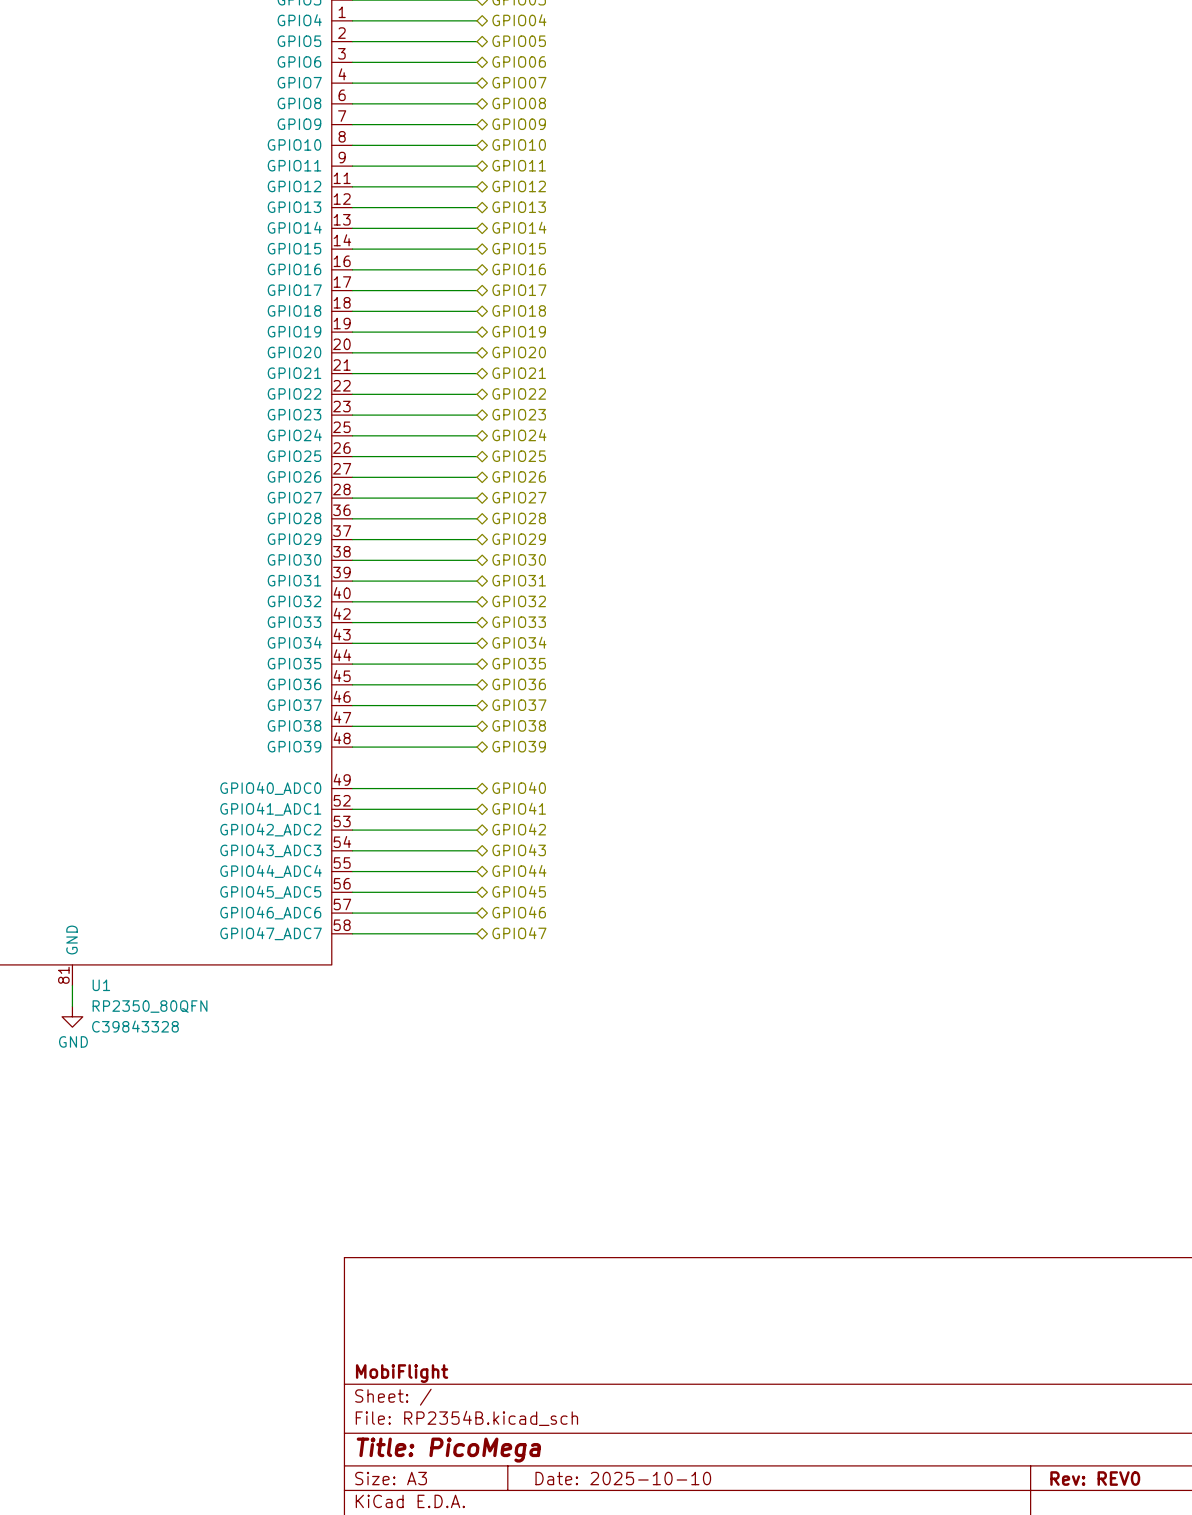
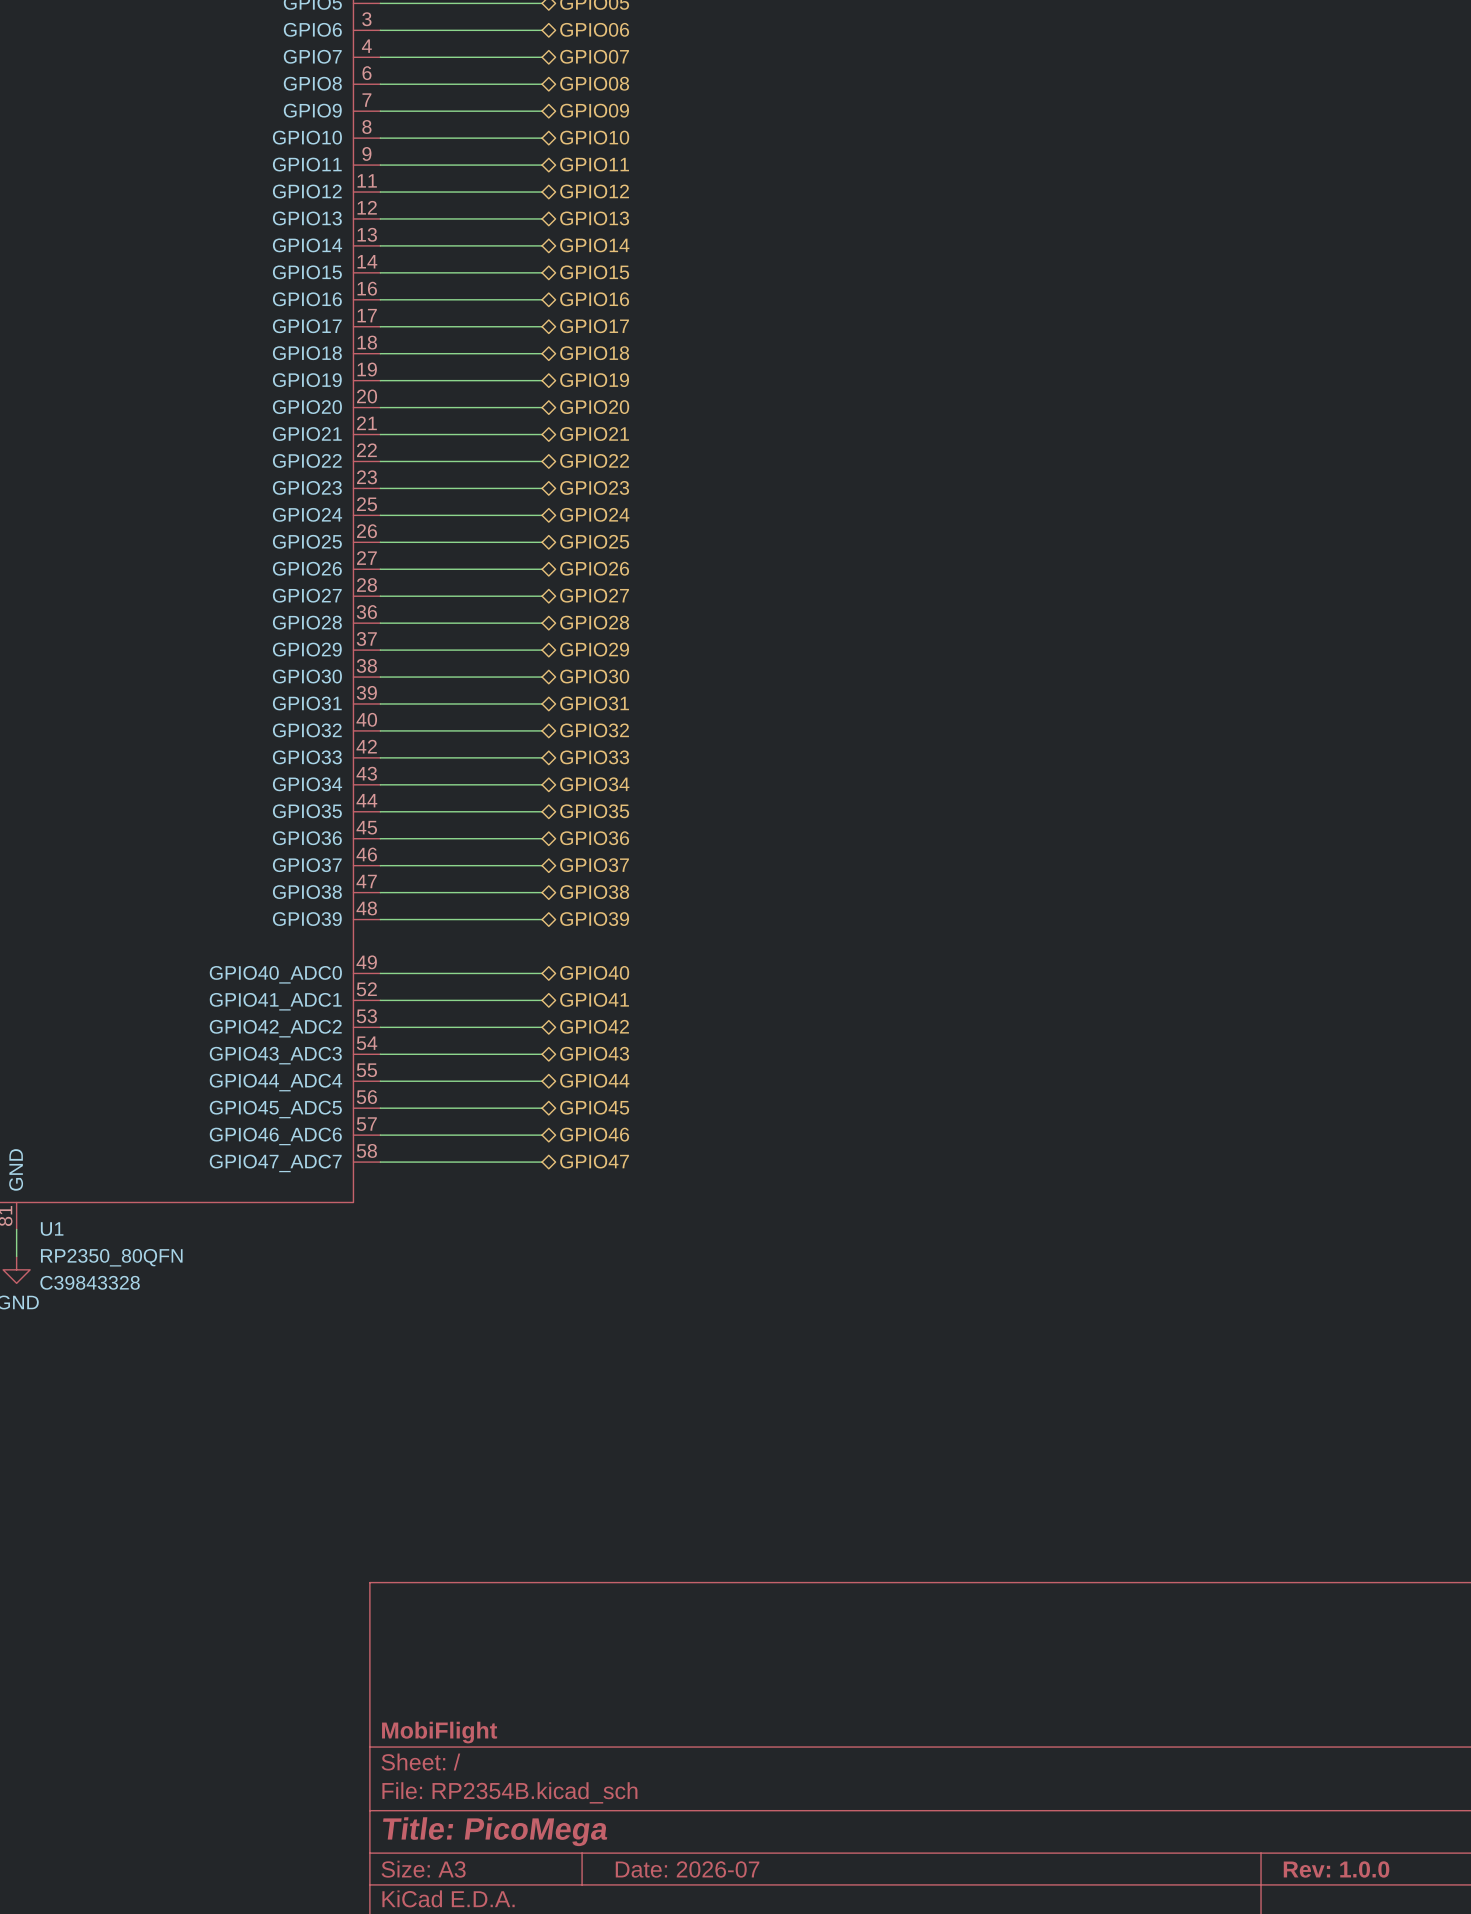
title block: Date: 2025-10-10 (623, 1478) -> Date: 2026-07 (687, 1869)
title block: Rev: REV0 (1095, 1478) -> Rev: 1.0.0 (1336, 1869)

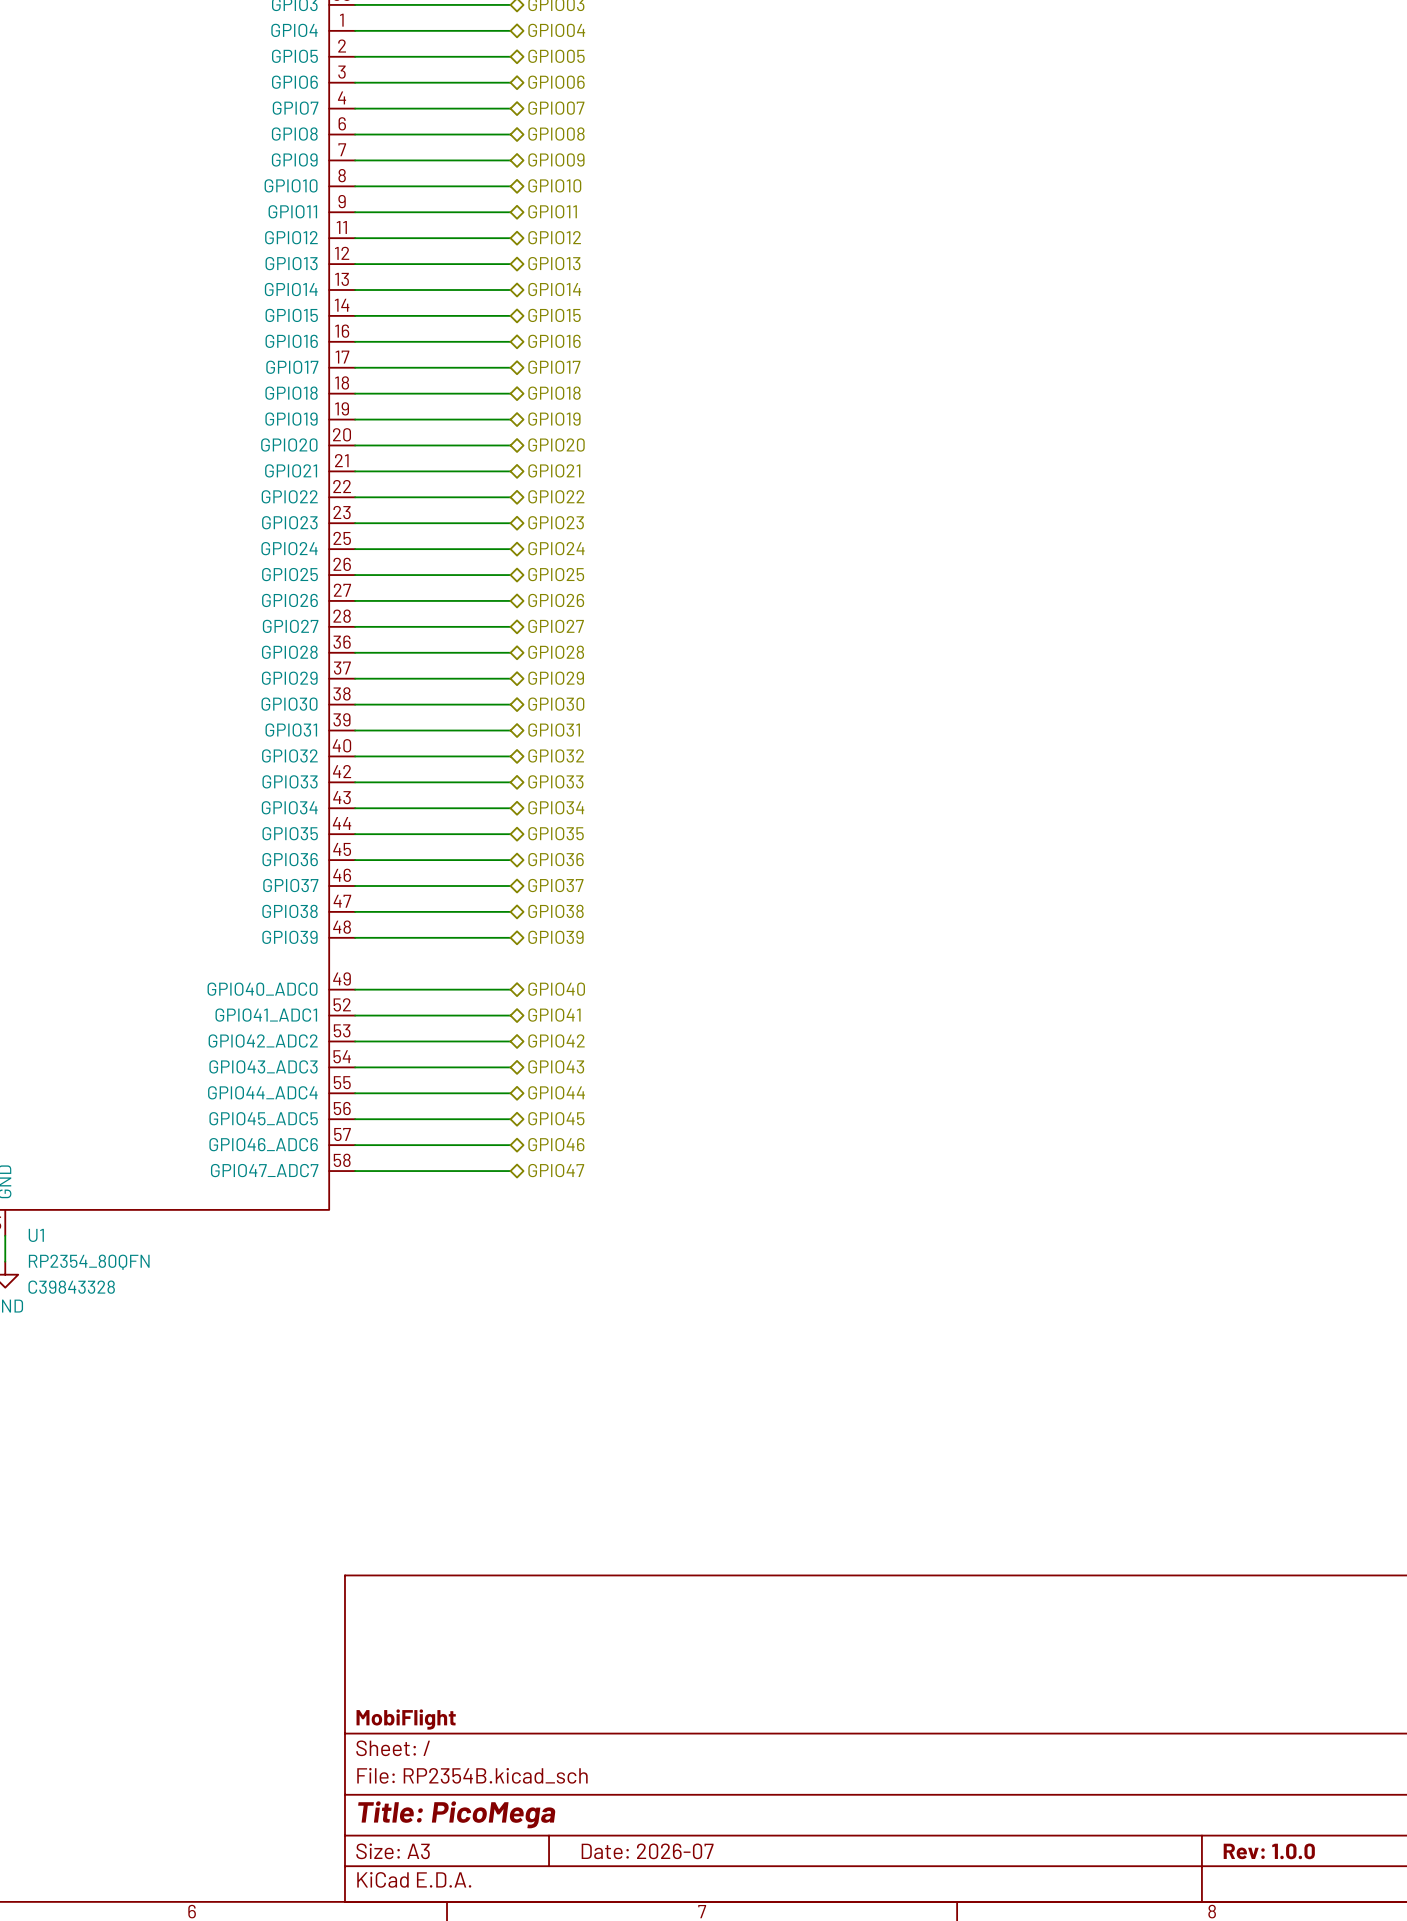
U1 value: RP2350_80QFN (111, 1257) -> RP2354_80QFN (89, 1262)

